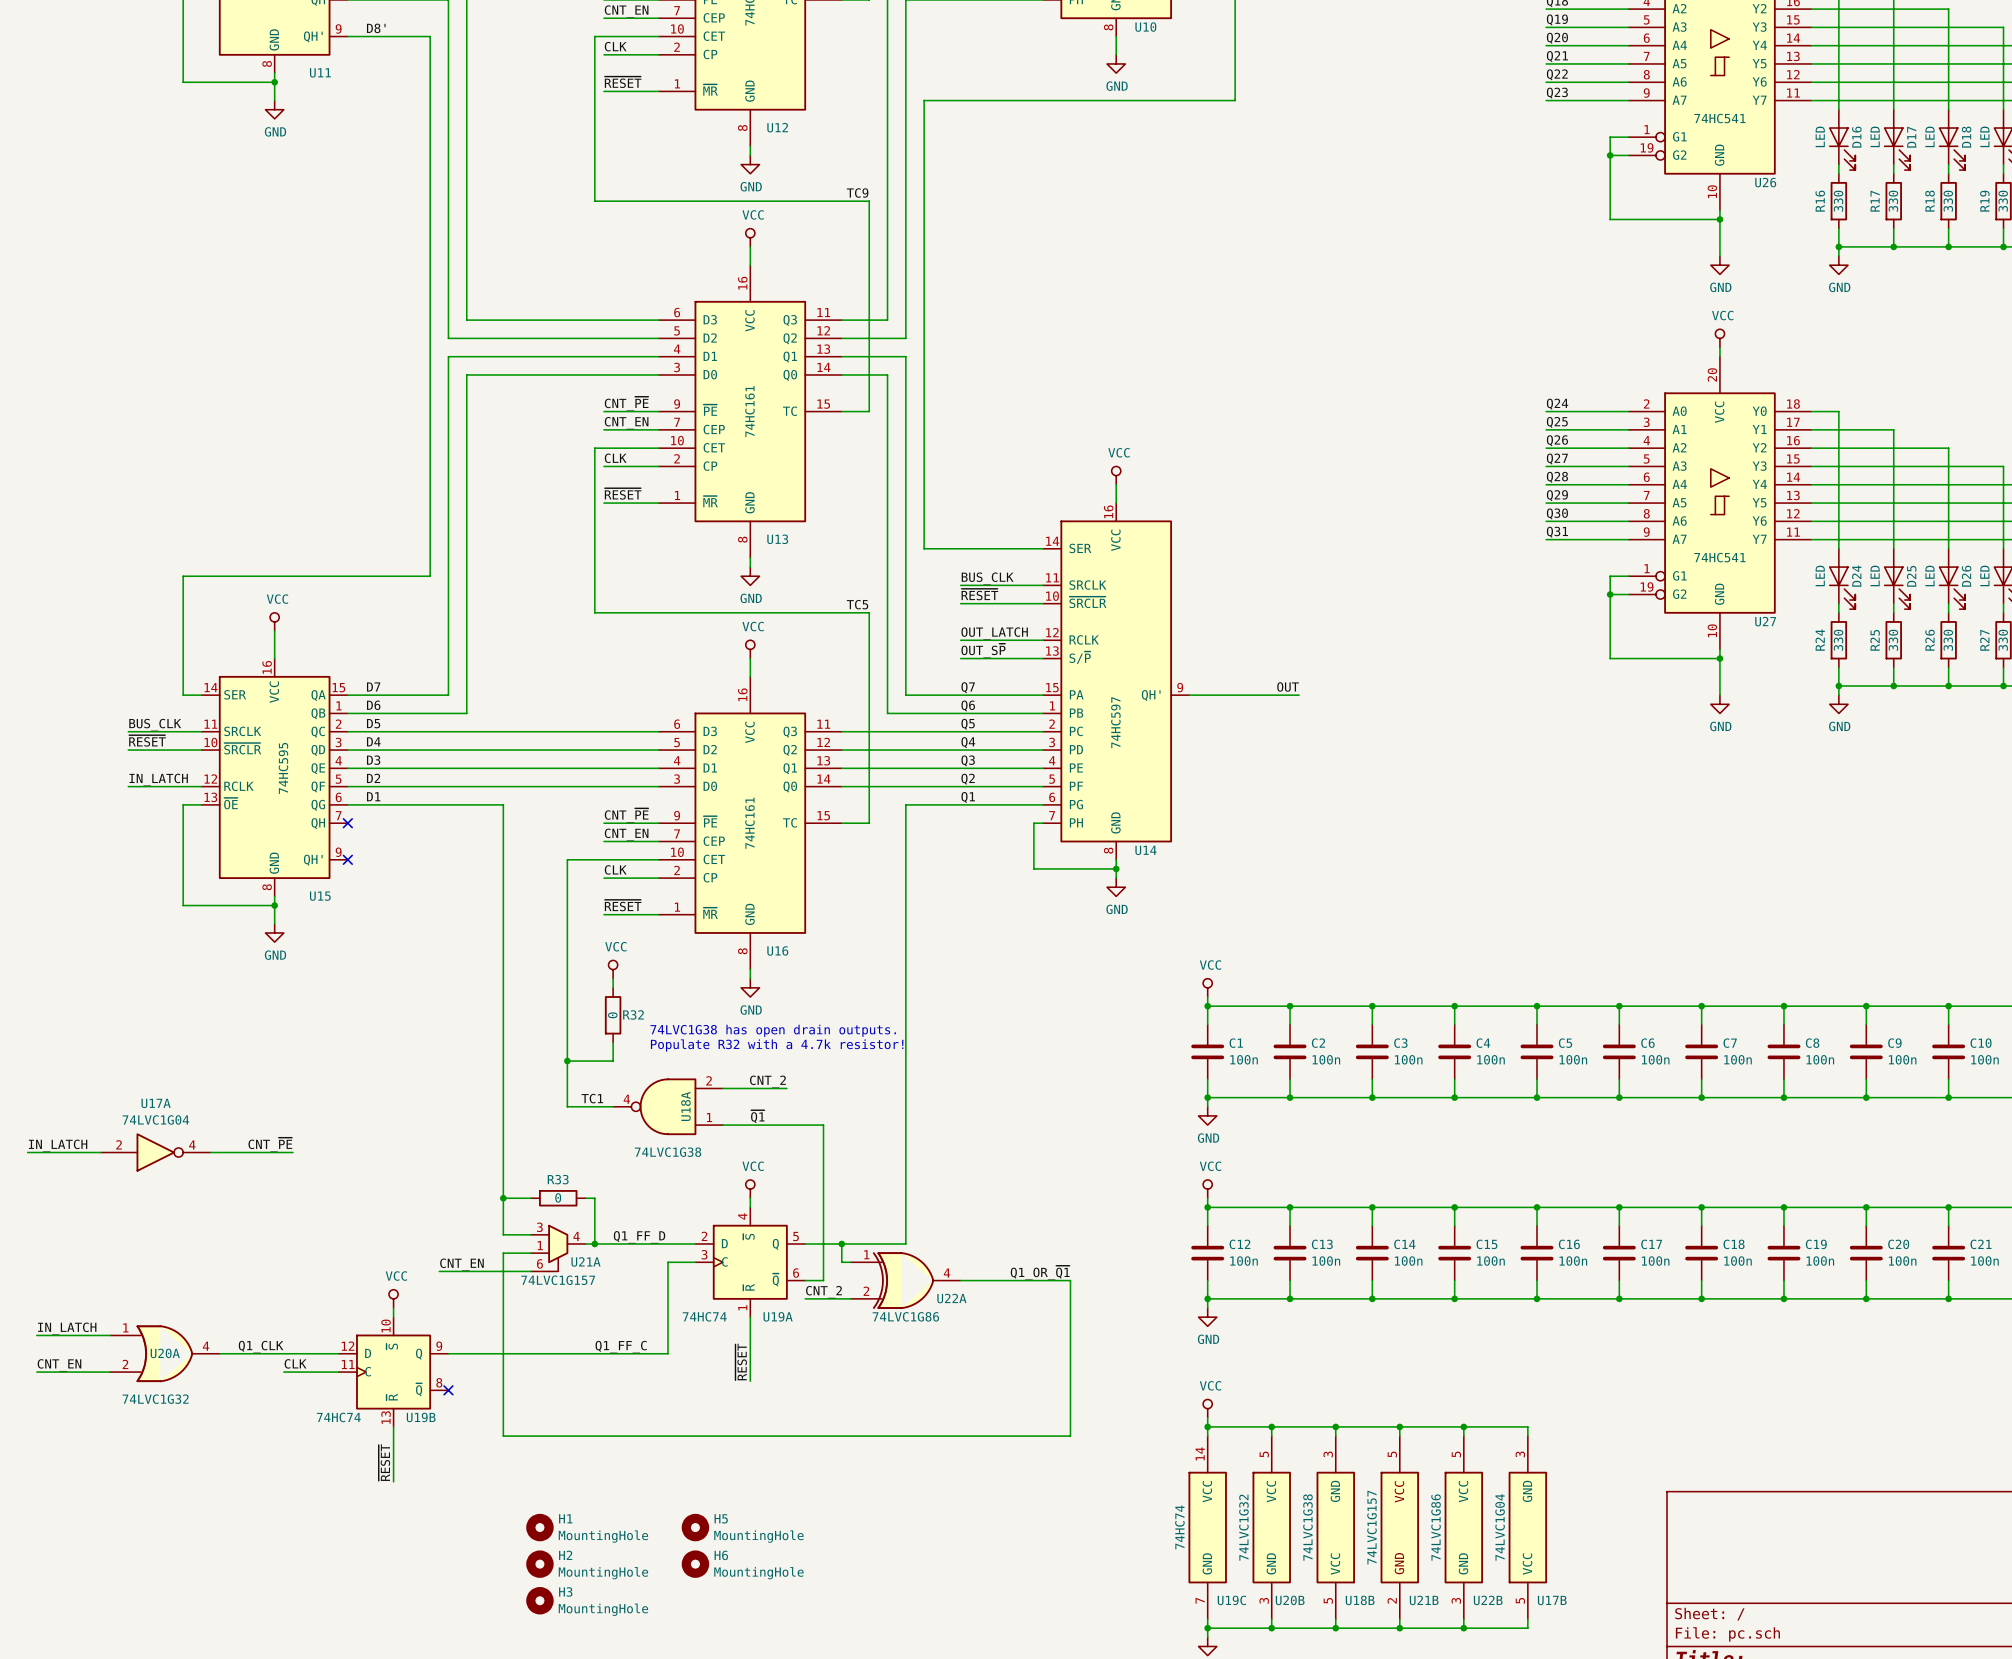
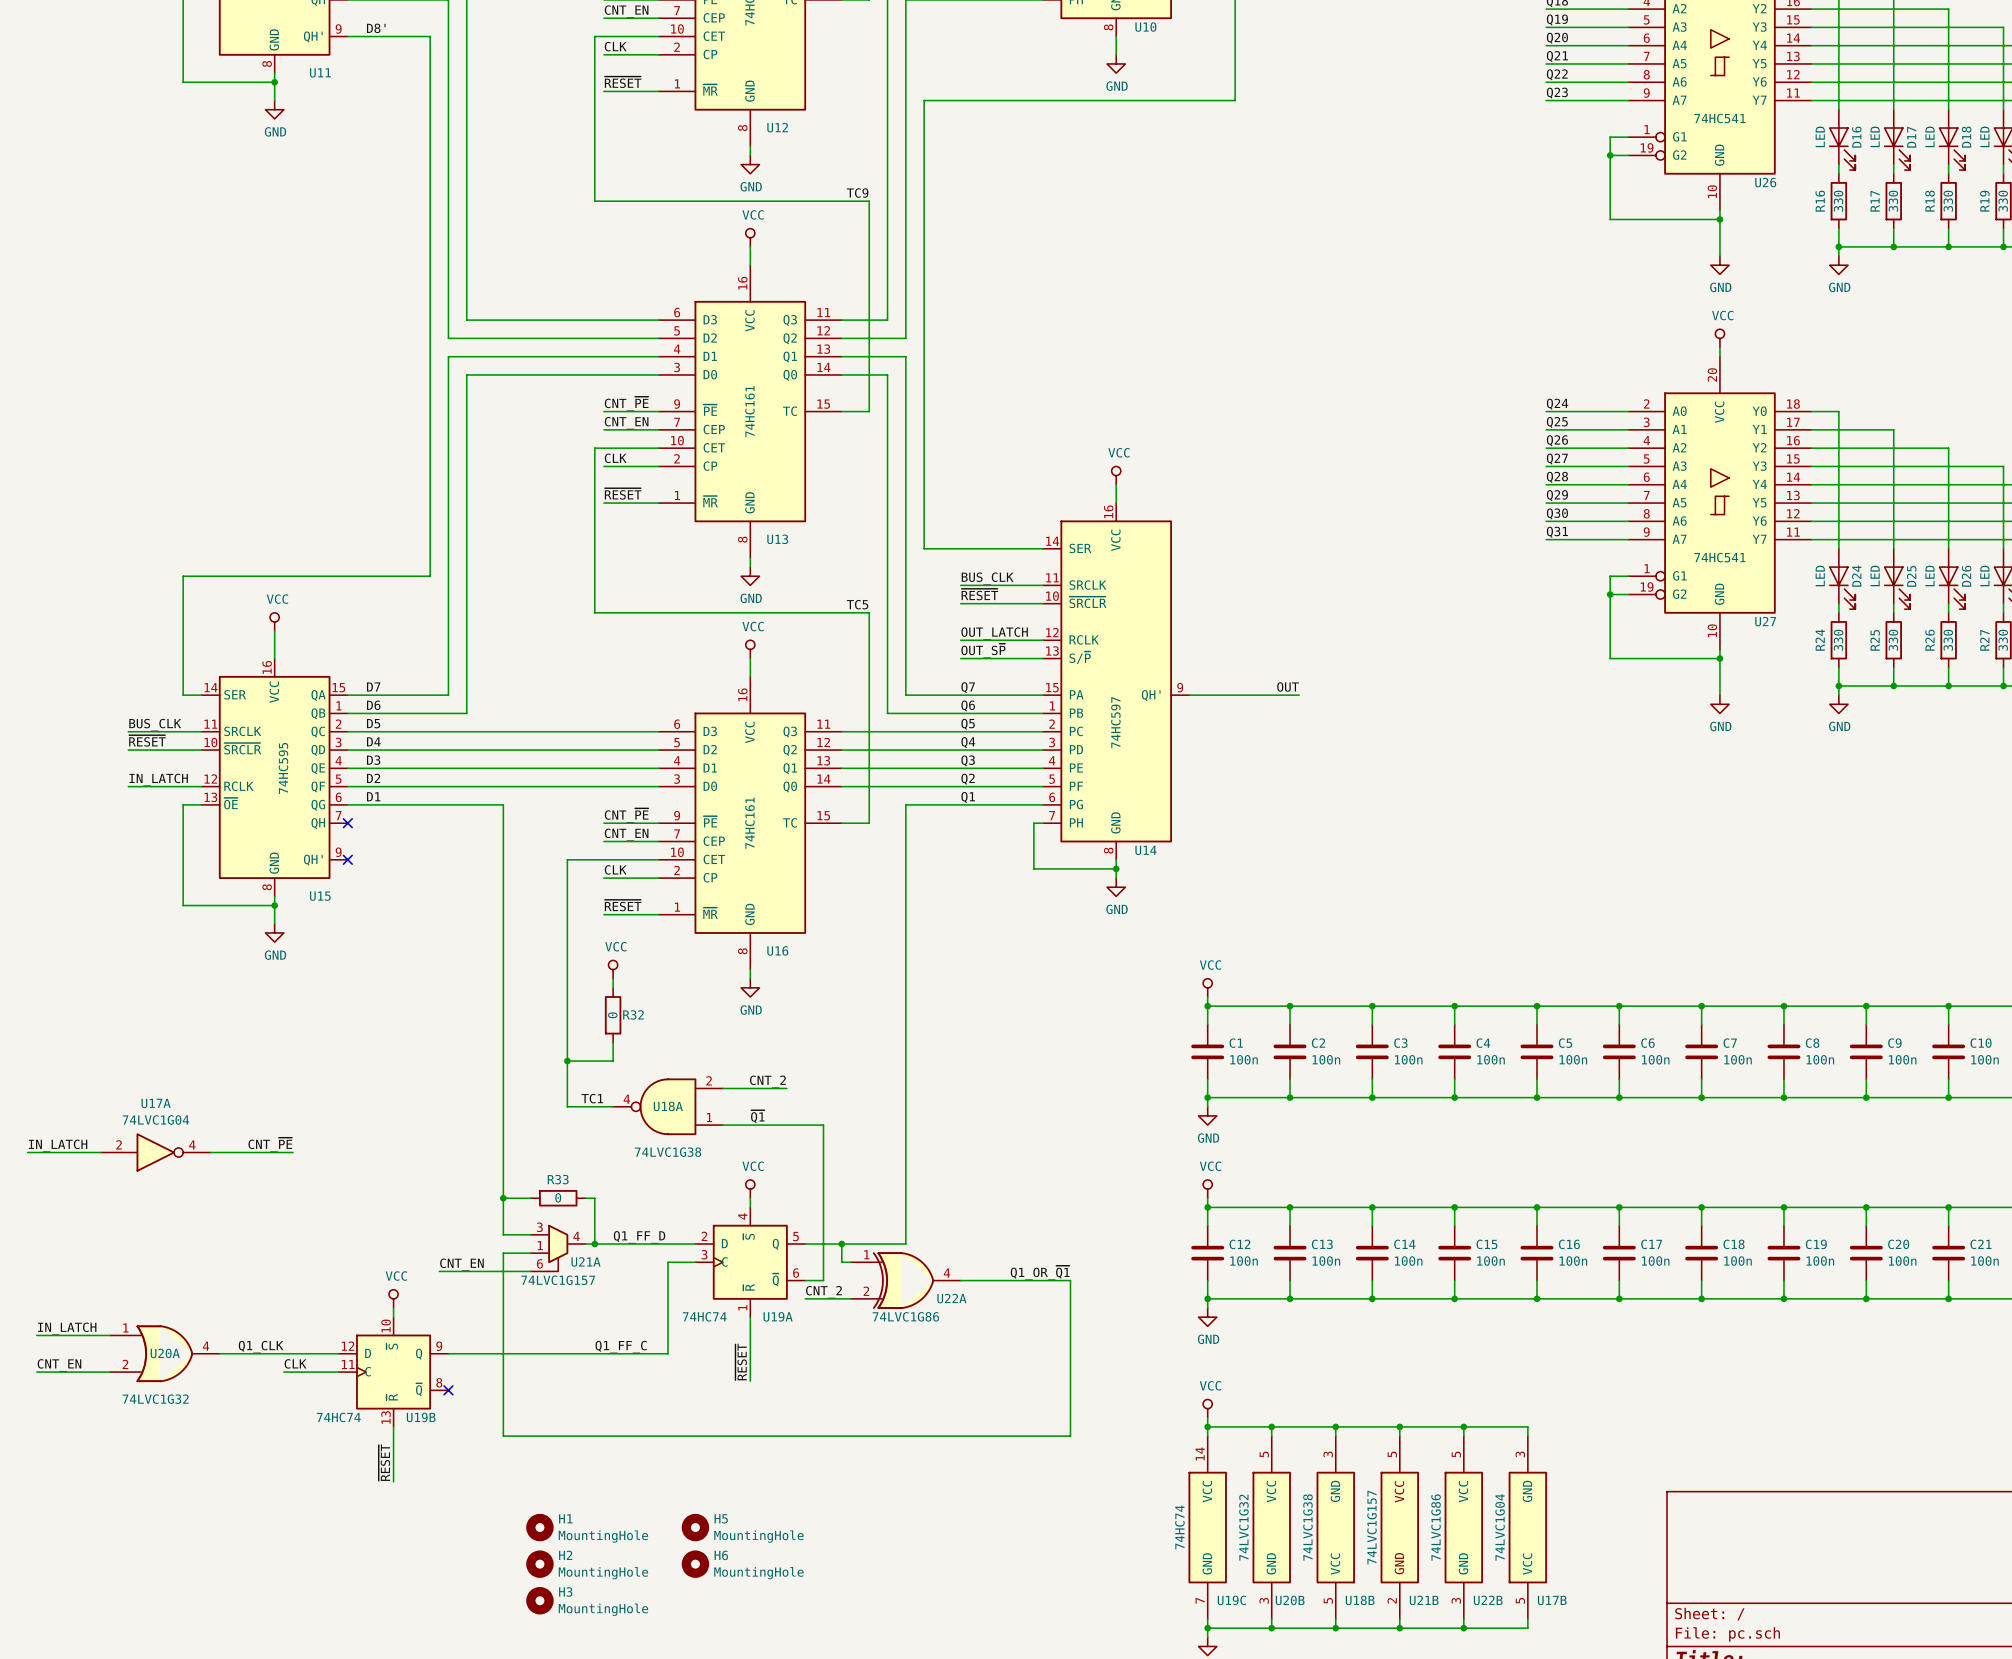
text: 74LVC1G38 has open drain outputs. (773, 1030) -> none
text: Populate R32 with a 4.7k resistor! (777, 1045) -> none
U18A name rotation: 0° (685, 1106) -> 90° clockwise (668, 1106)

